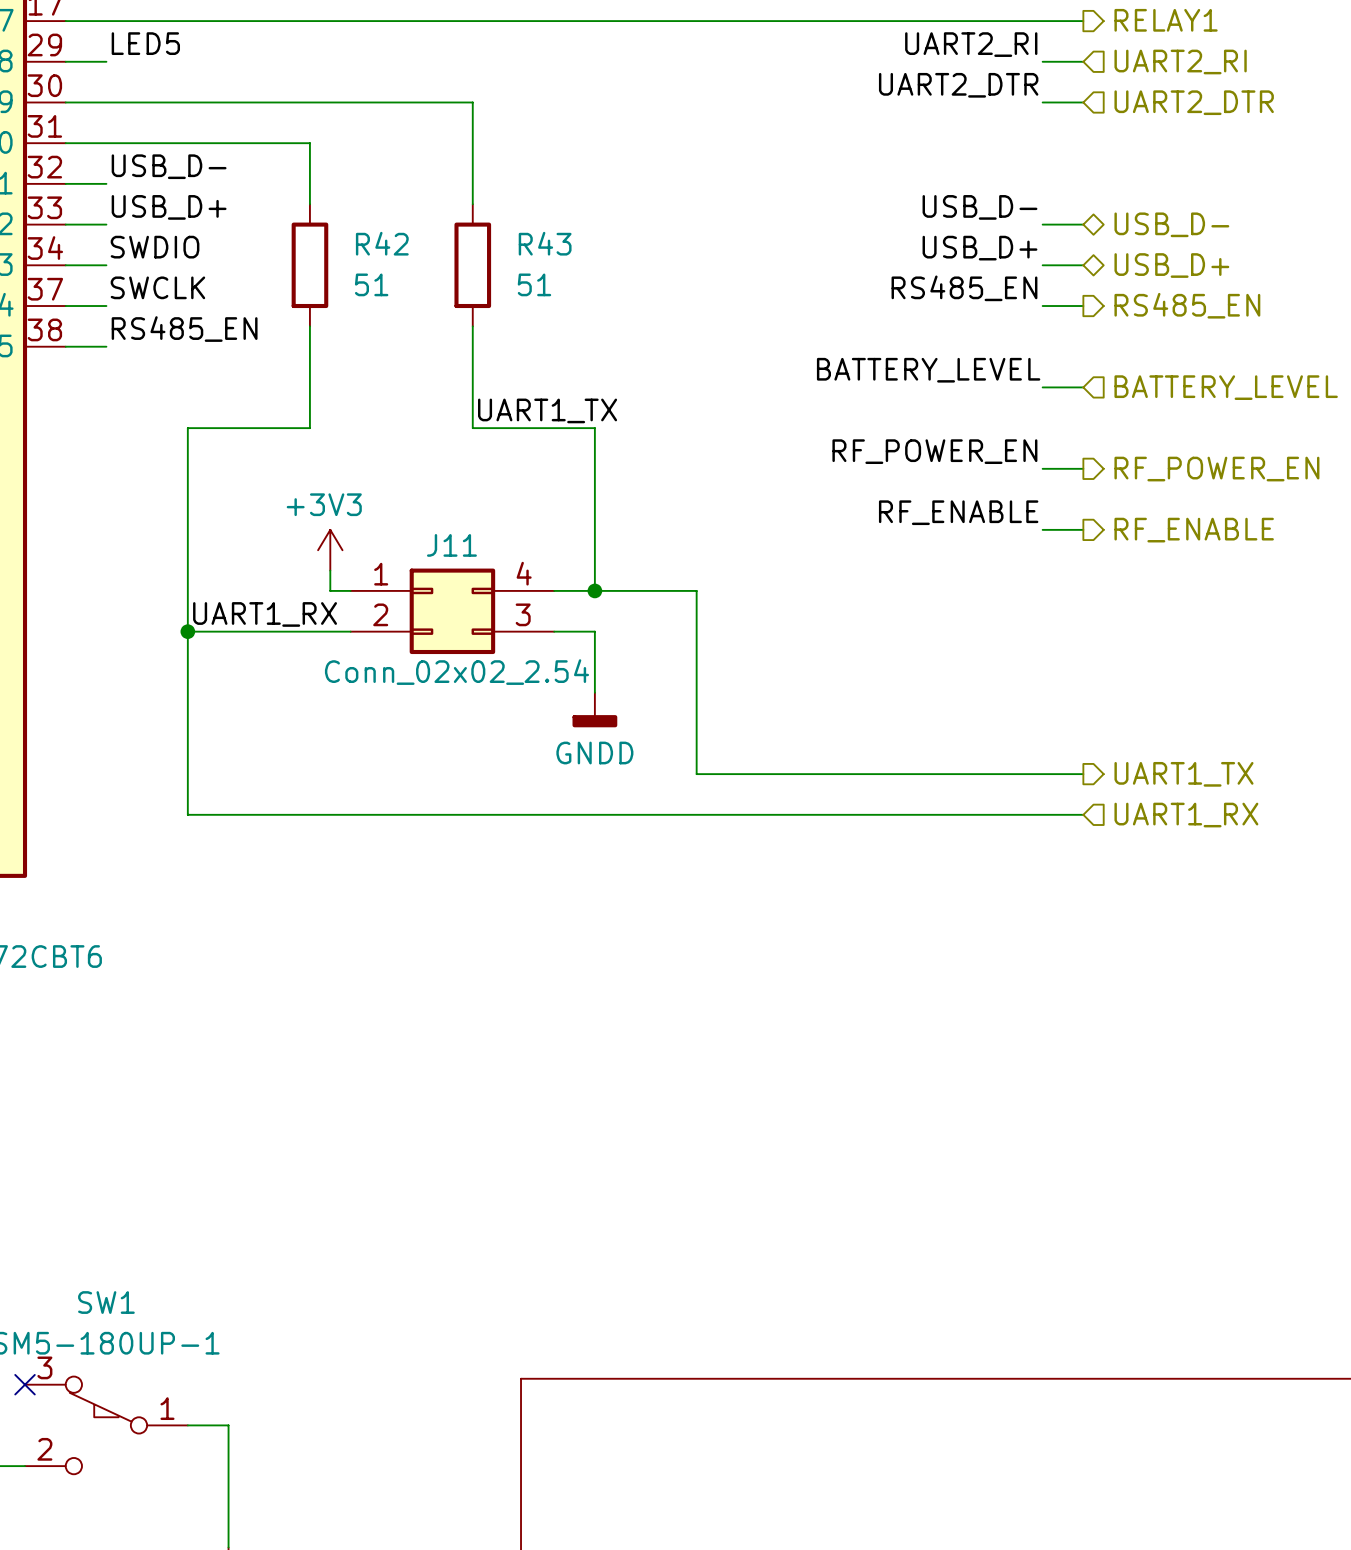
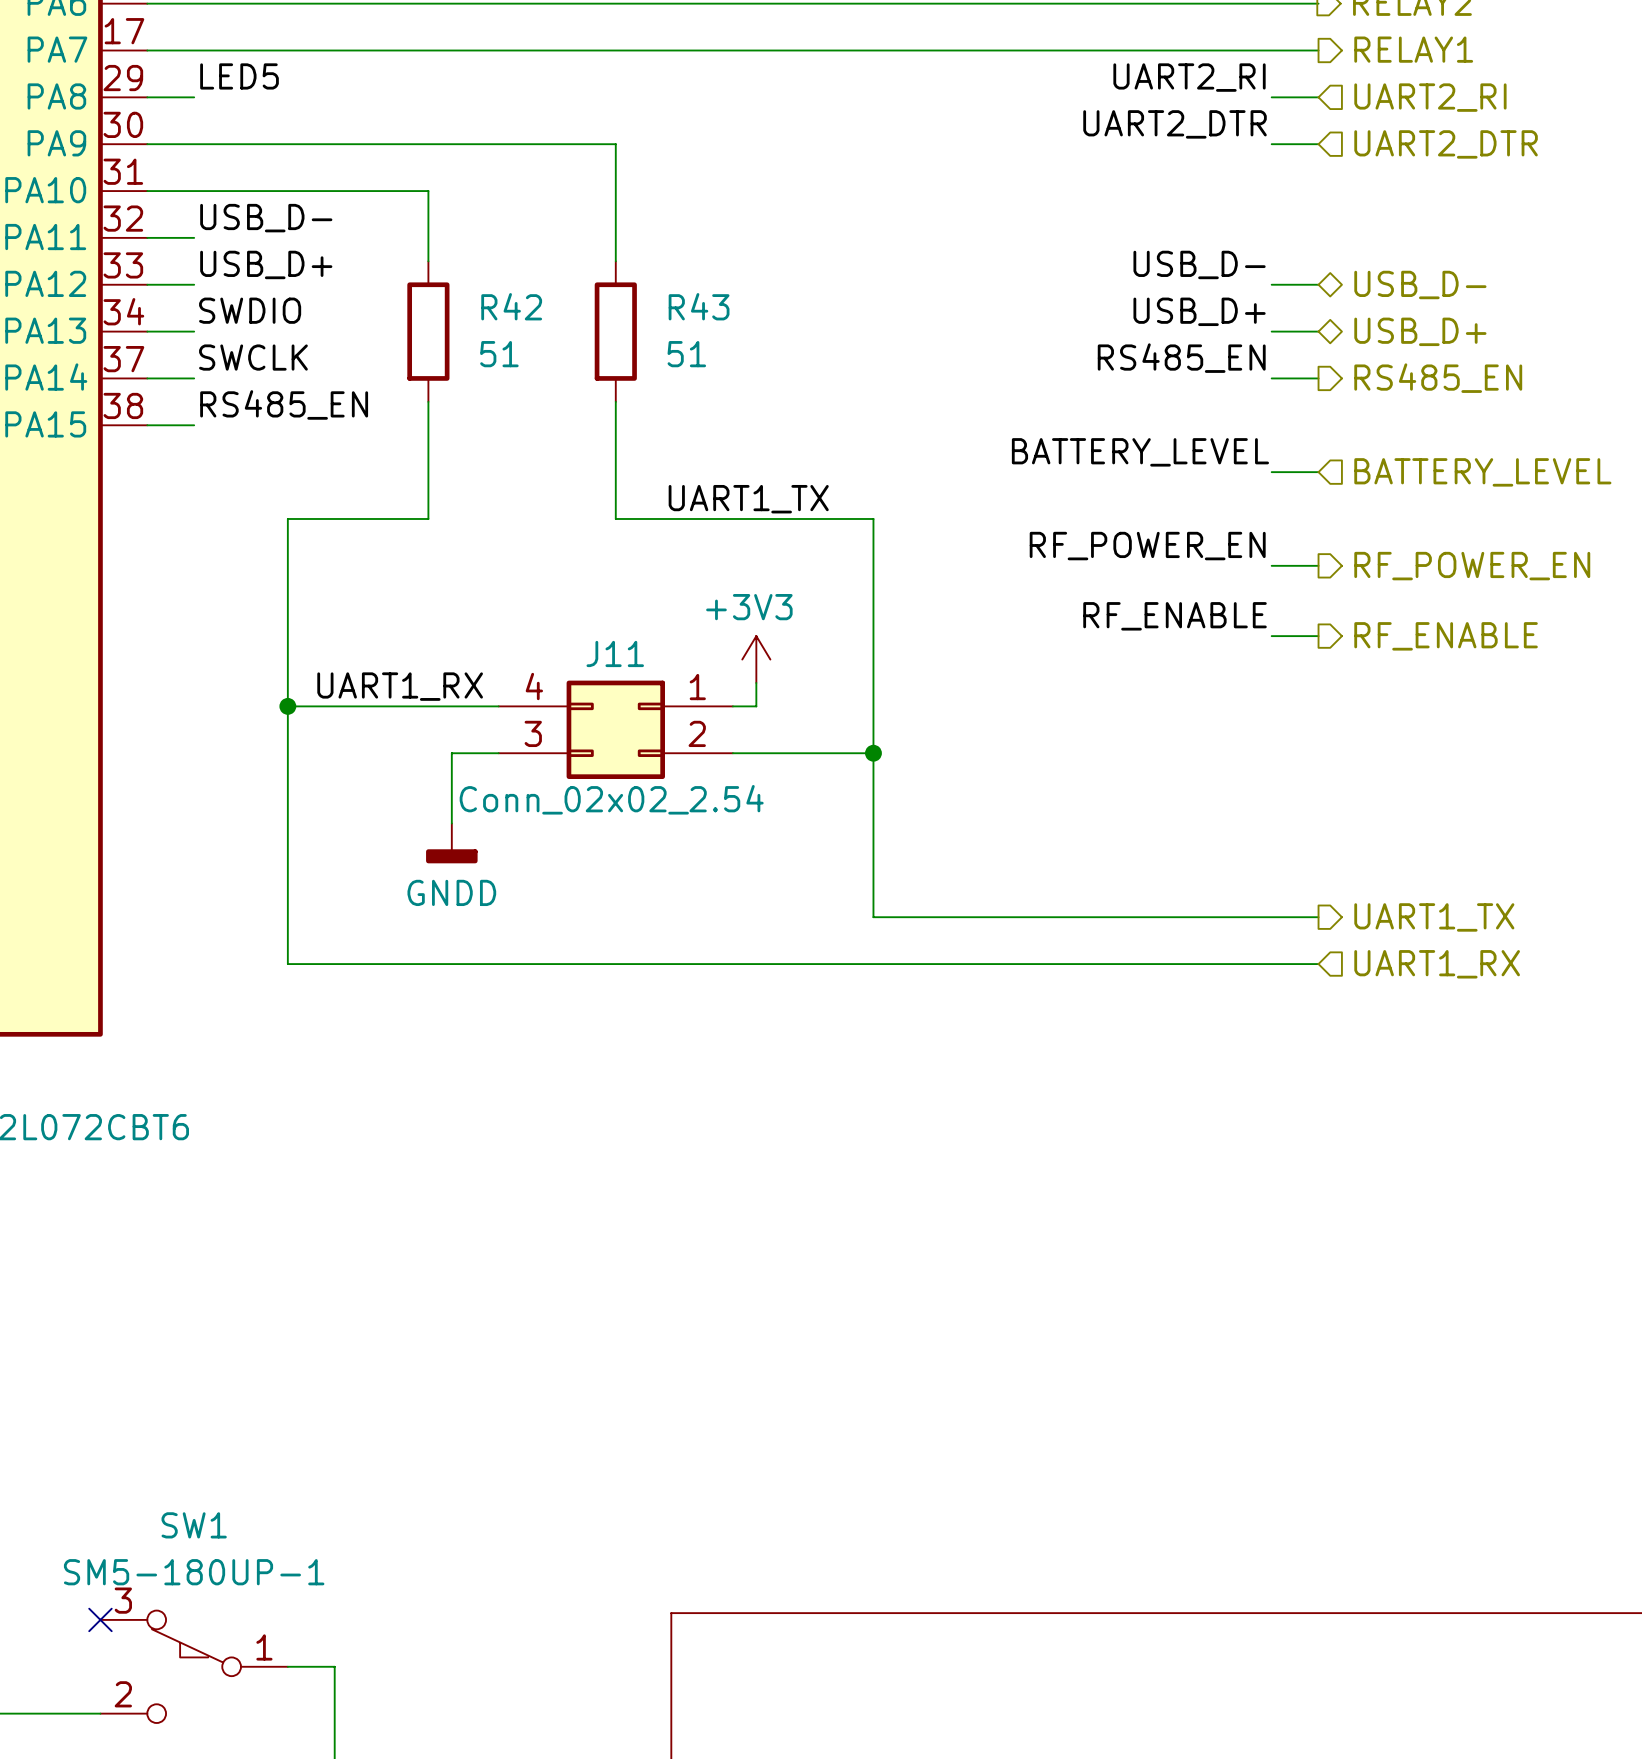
label position: UART1_TX (547, 410) -> UART1_TX (748, 499)
wire: (594, 428) (594, 570) -> (756, 518) (873, 518) (873, 706)
power symbol position: +3V3 (330, 550) -> +3V3 (756, 659)
wire: (330, 570) (330, 590) -> (287, 706) (451, 706)
wire: (594, 590) (696, 590) -> none
junction: (594, 590) -> none
J11 flip: as is (452, 611) -> left-right (615, 729)
label position: UART1_RX (265, 614) -> UART1_RX (400, 686)
wire: (187, 631) (330, 631) -> (451, 823) (451, 753)
junction position: (187, 631) -> (287, 706)
wire: (594, 631) (594, 692) -> (756, 753) (873, 753)
junction: none -> (873, 753)
power symbol position: GNDD (594, 710) -> GNDD (451, 843)

